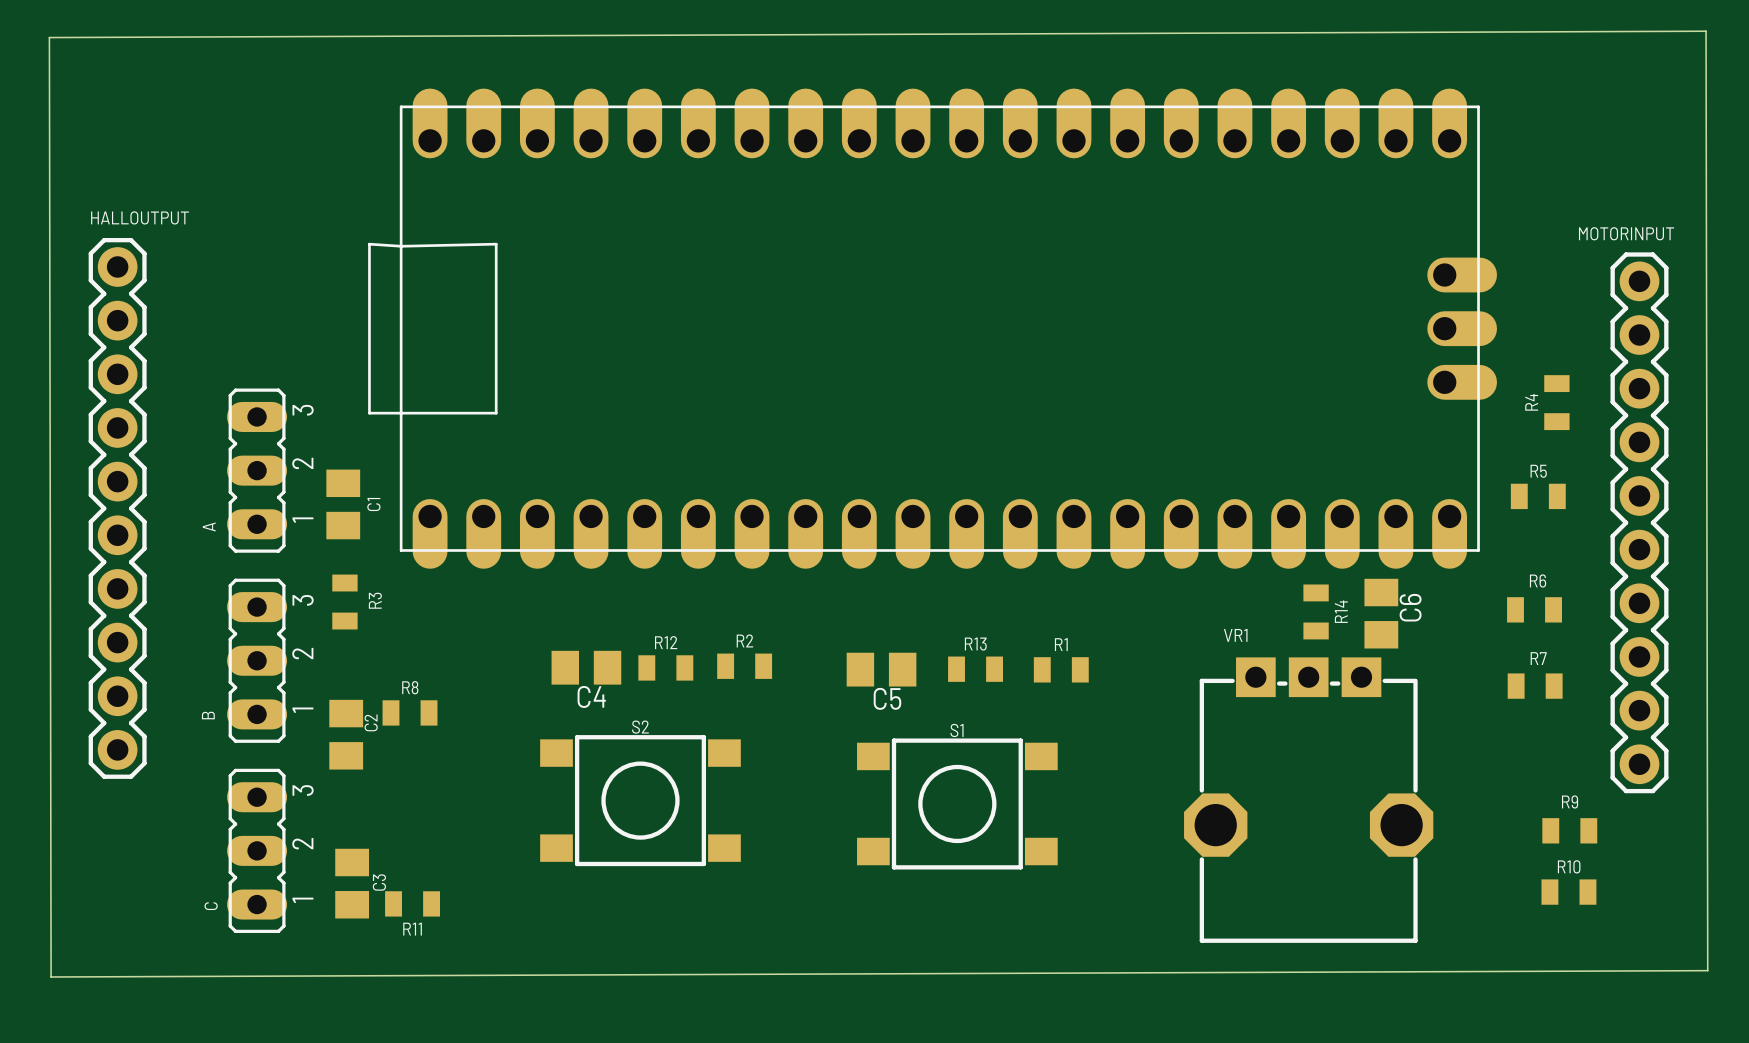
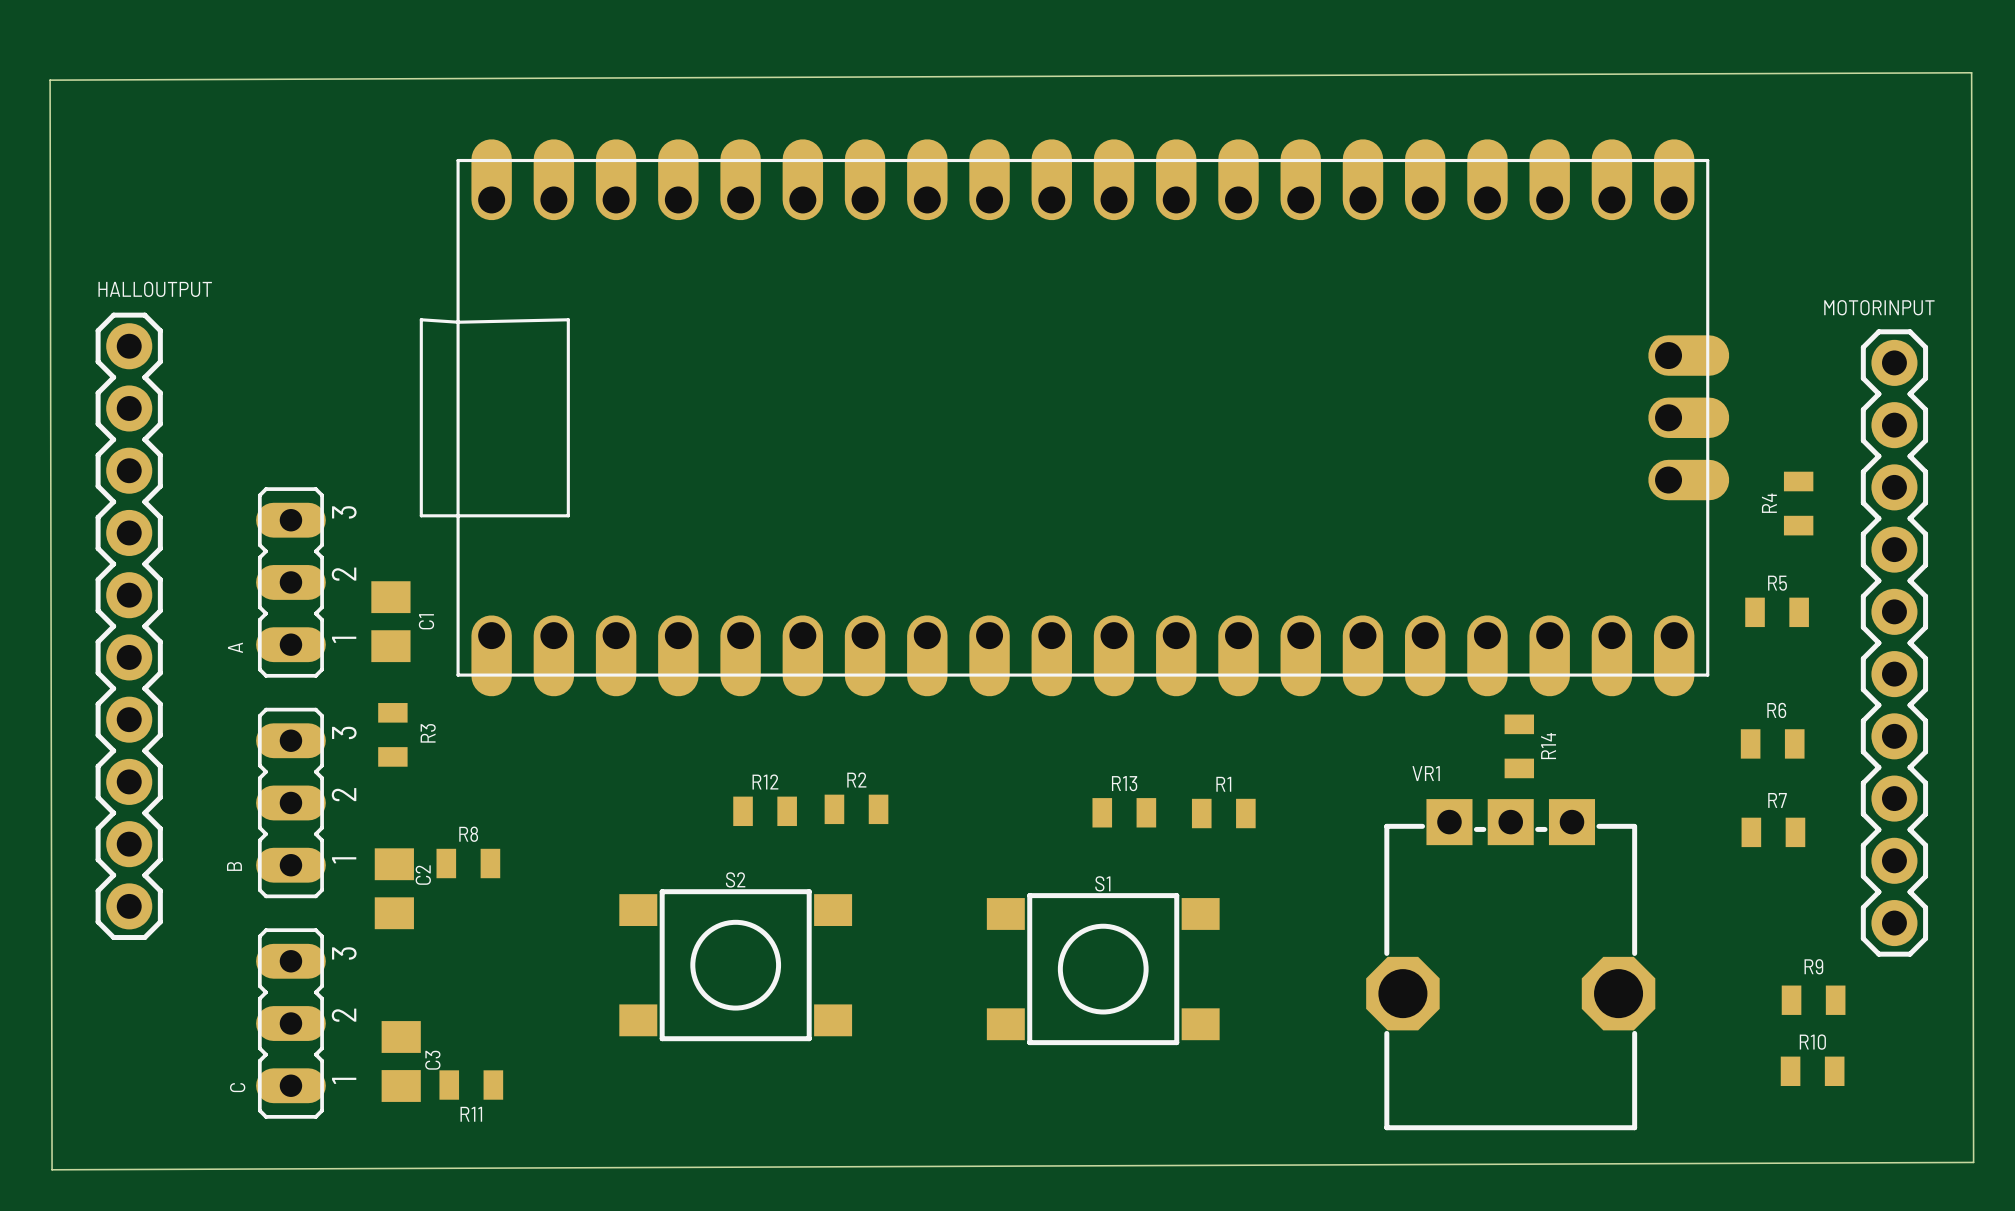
C6: (1381, 613) -> none
C4: (586, 667) -> none
C5: (881, 669) -> none

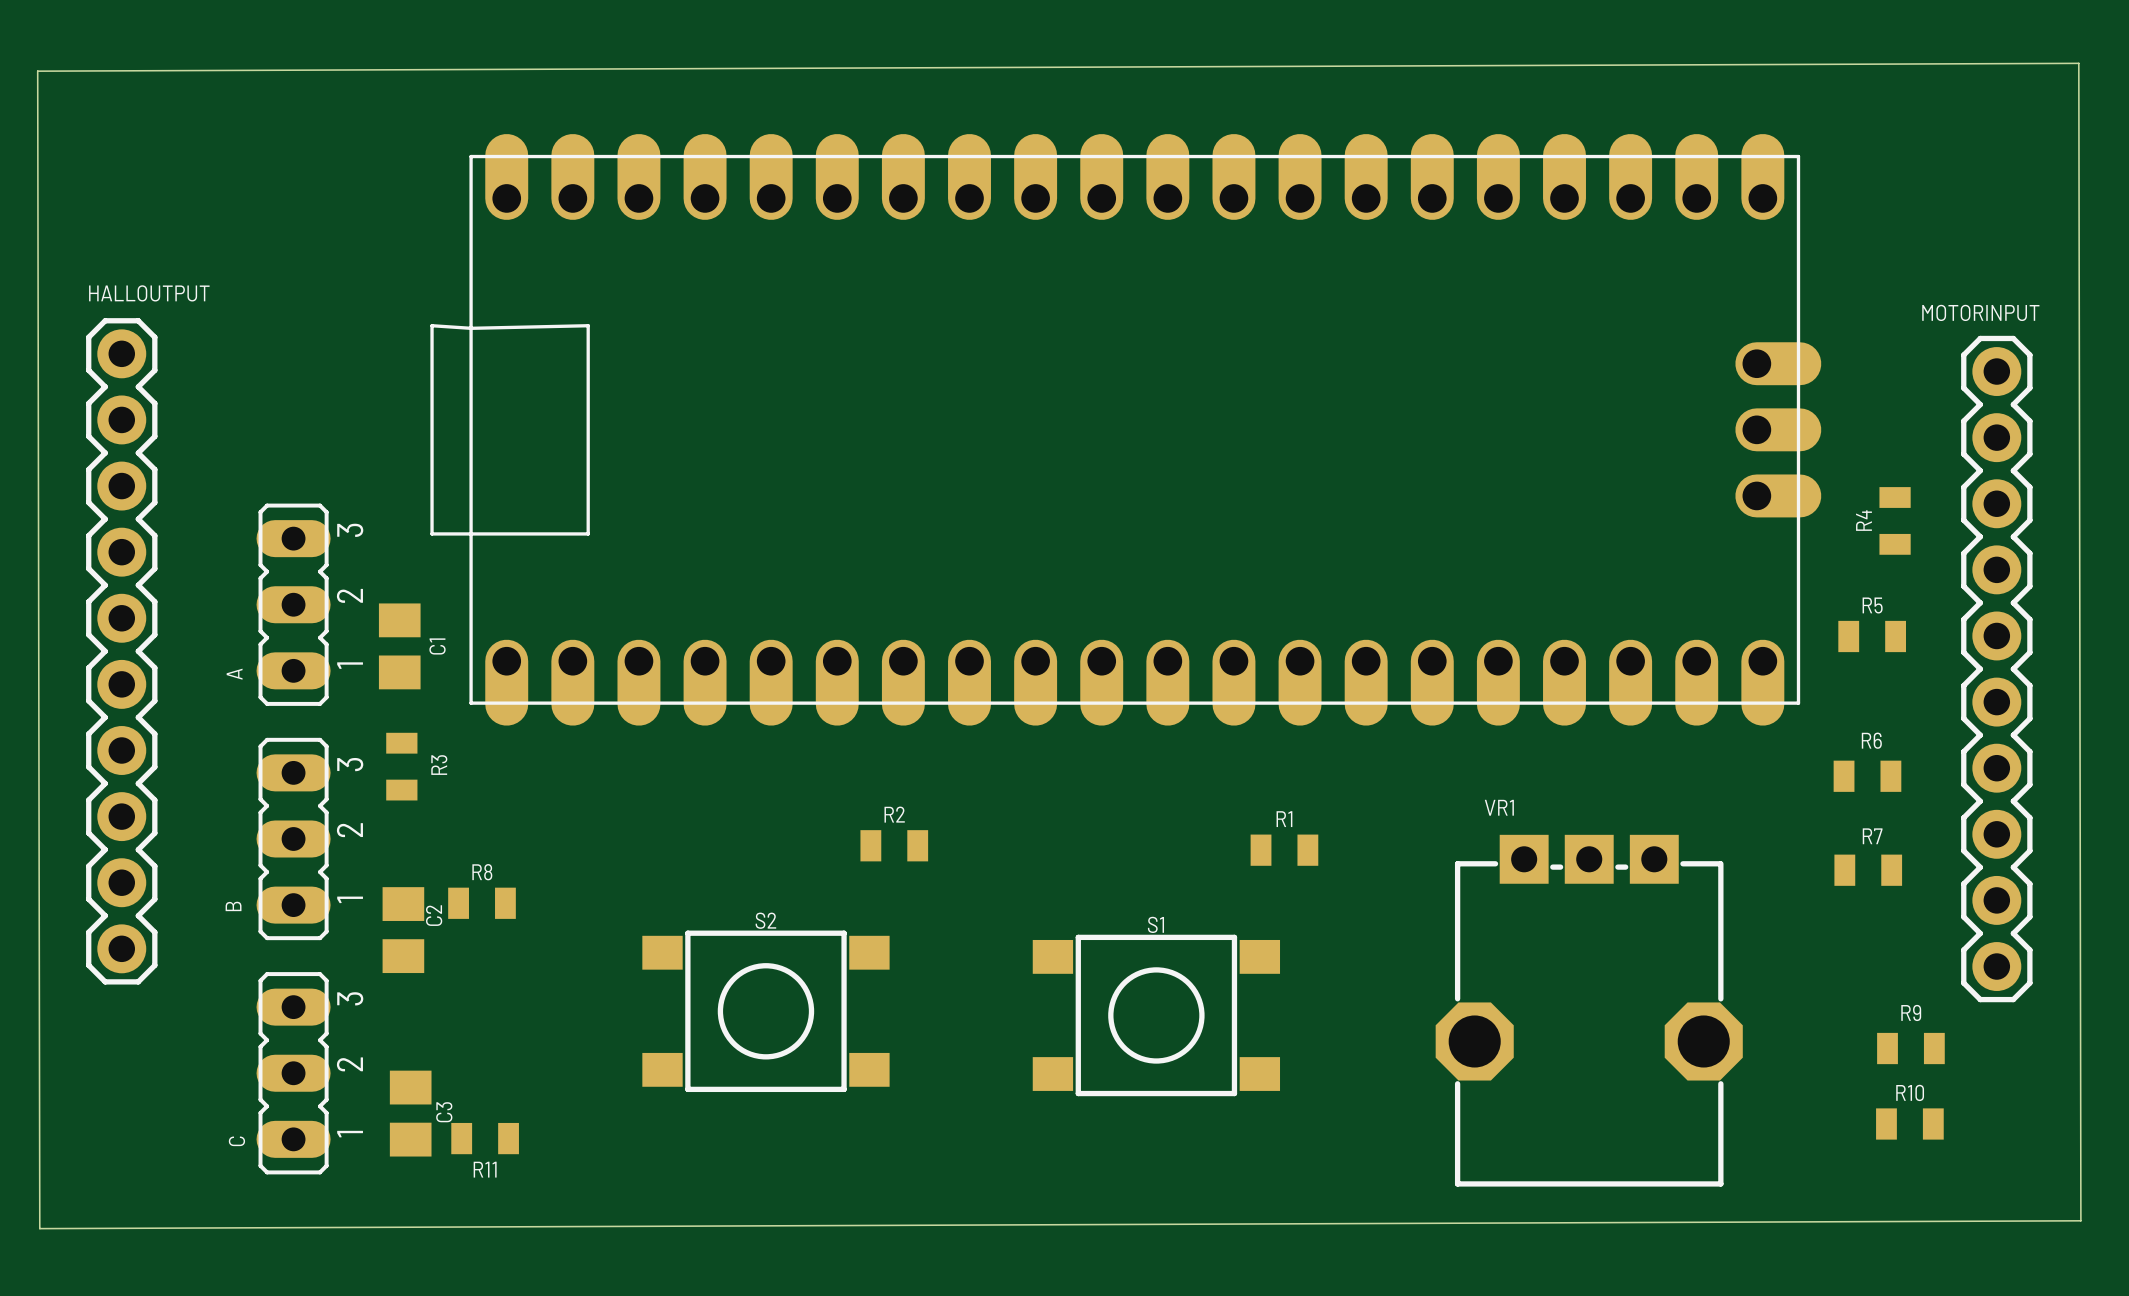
R14: (1519, 746) -> none
R12: (765, 811) -> none
R13: (1124, 812) -> none

